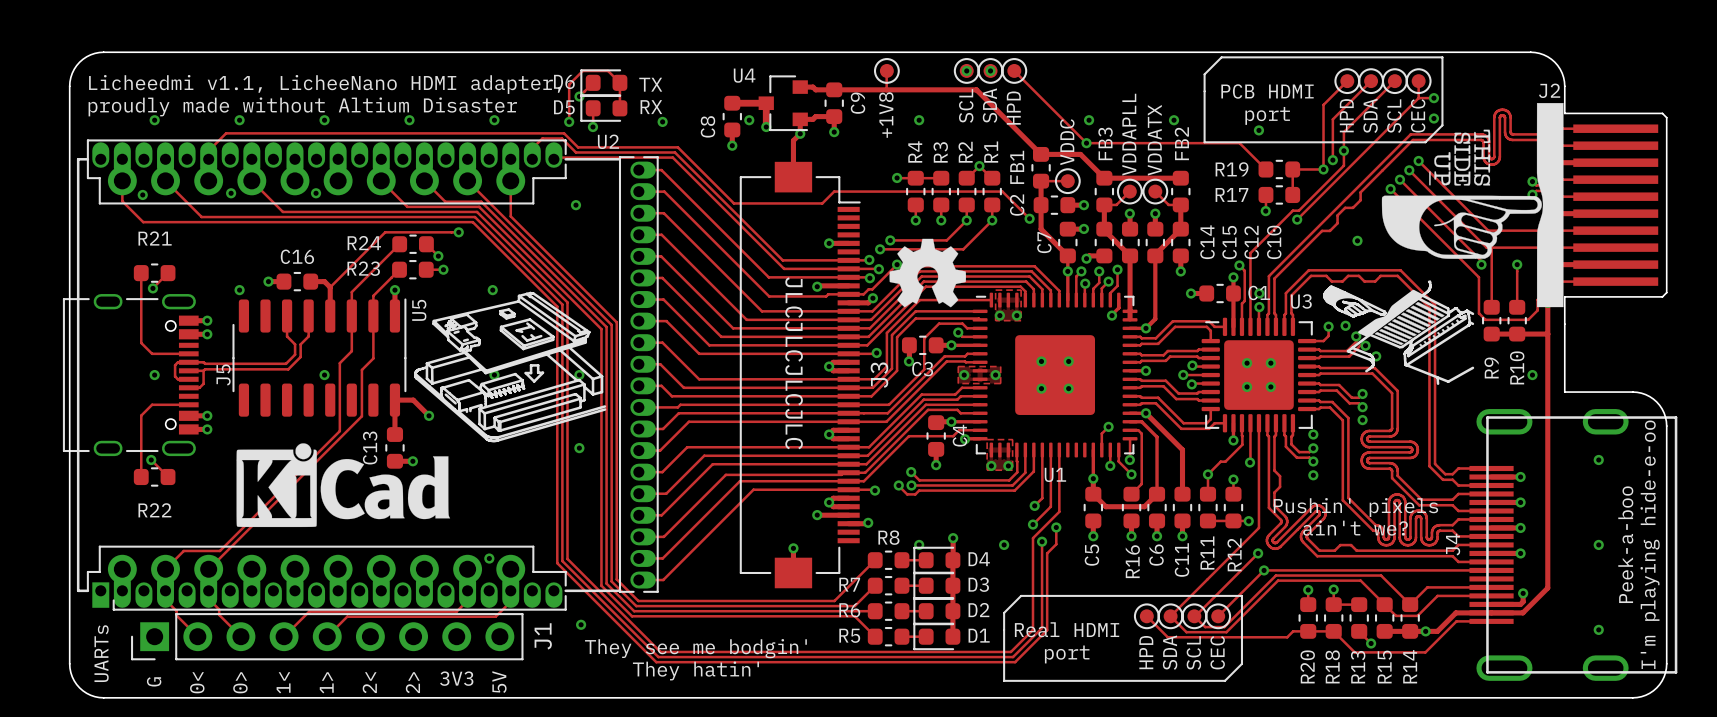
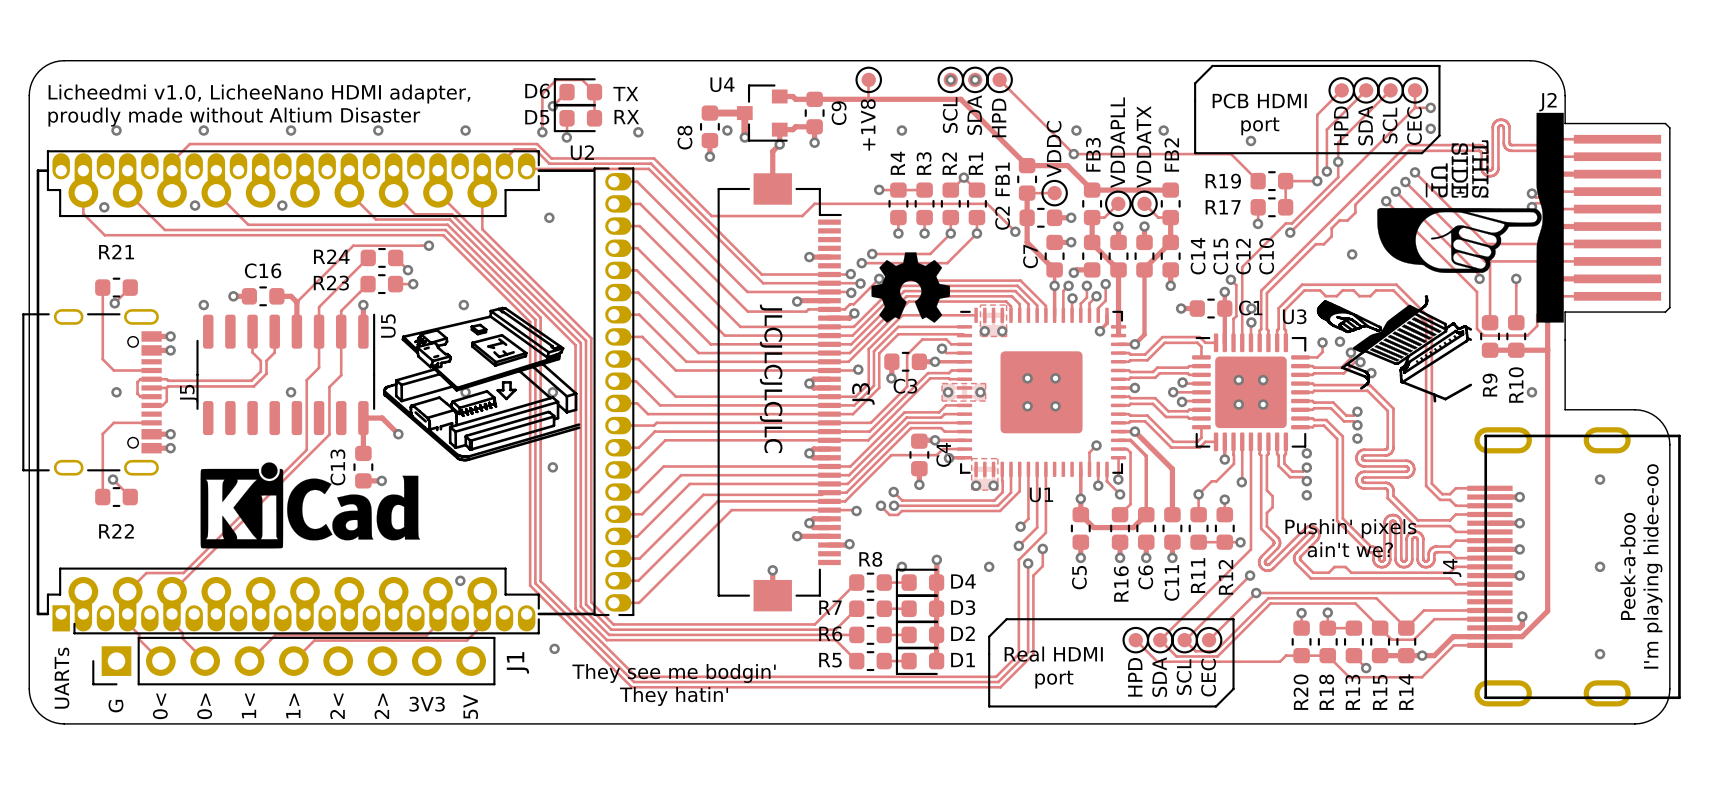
text: Licheedmi v1.1, LicheeNano HDMI adapter, (325, 84) -> Licheedmi v1.0, LicheeNano HDMI adapter, (259, 94)

